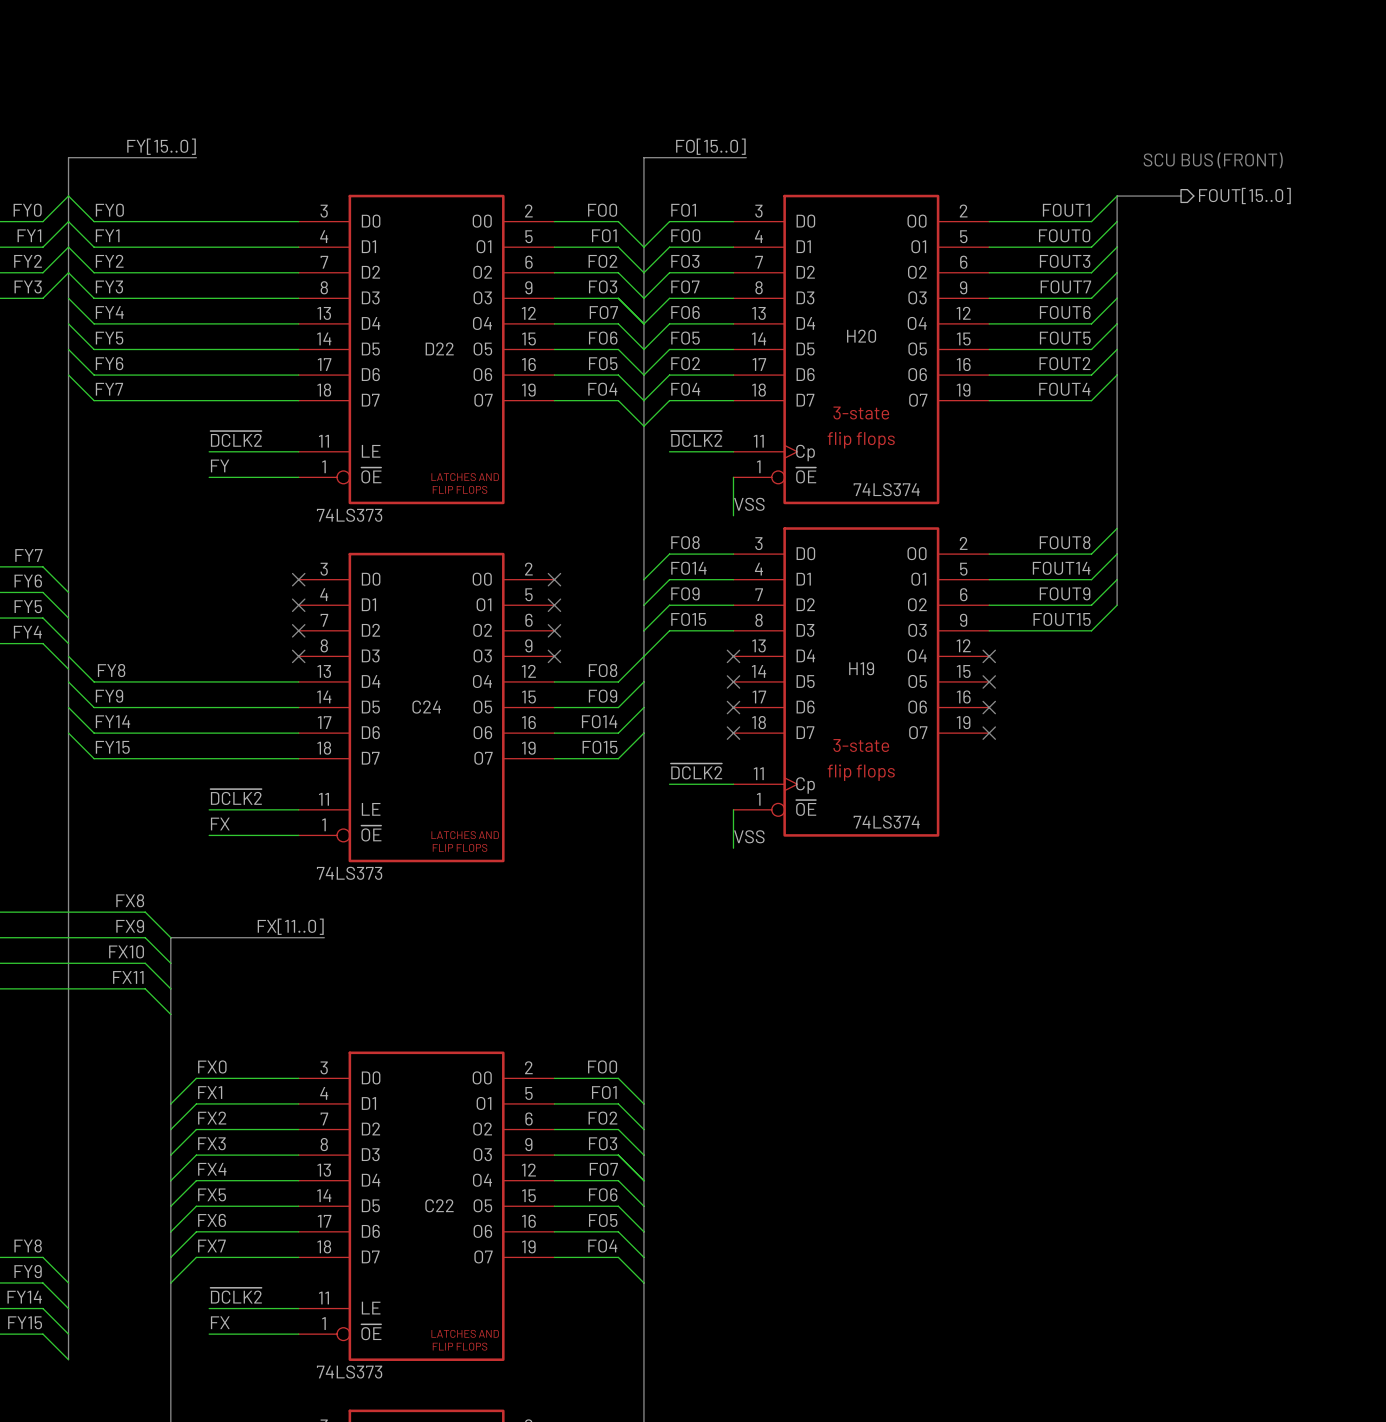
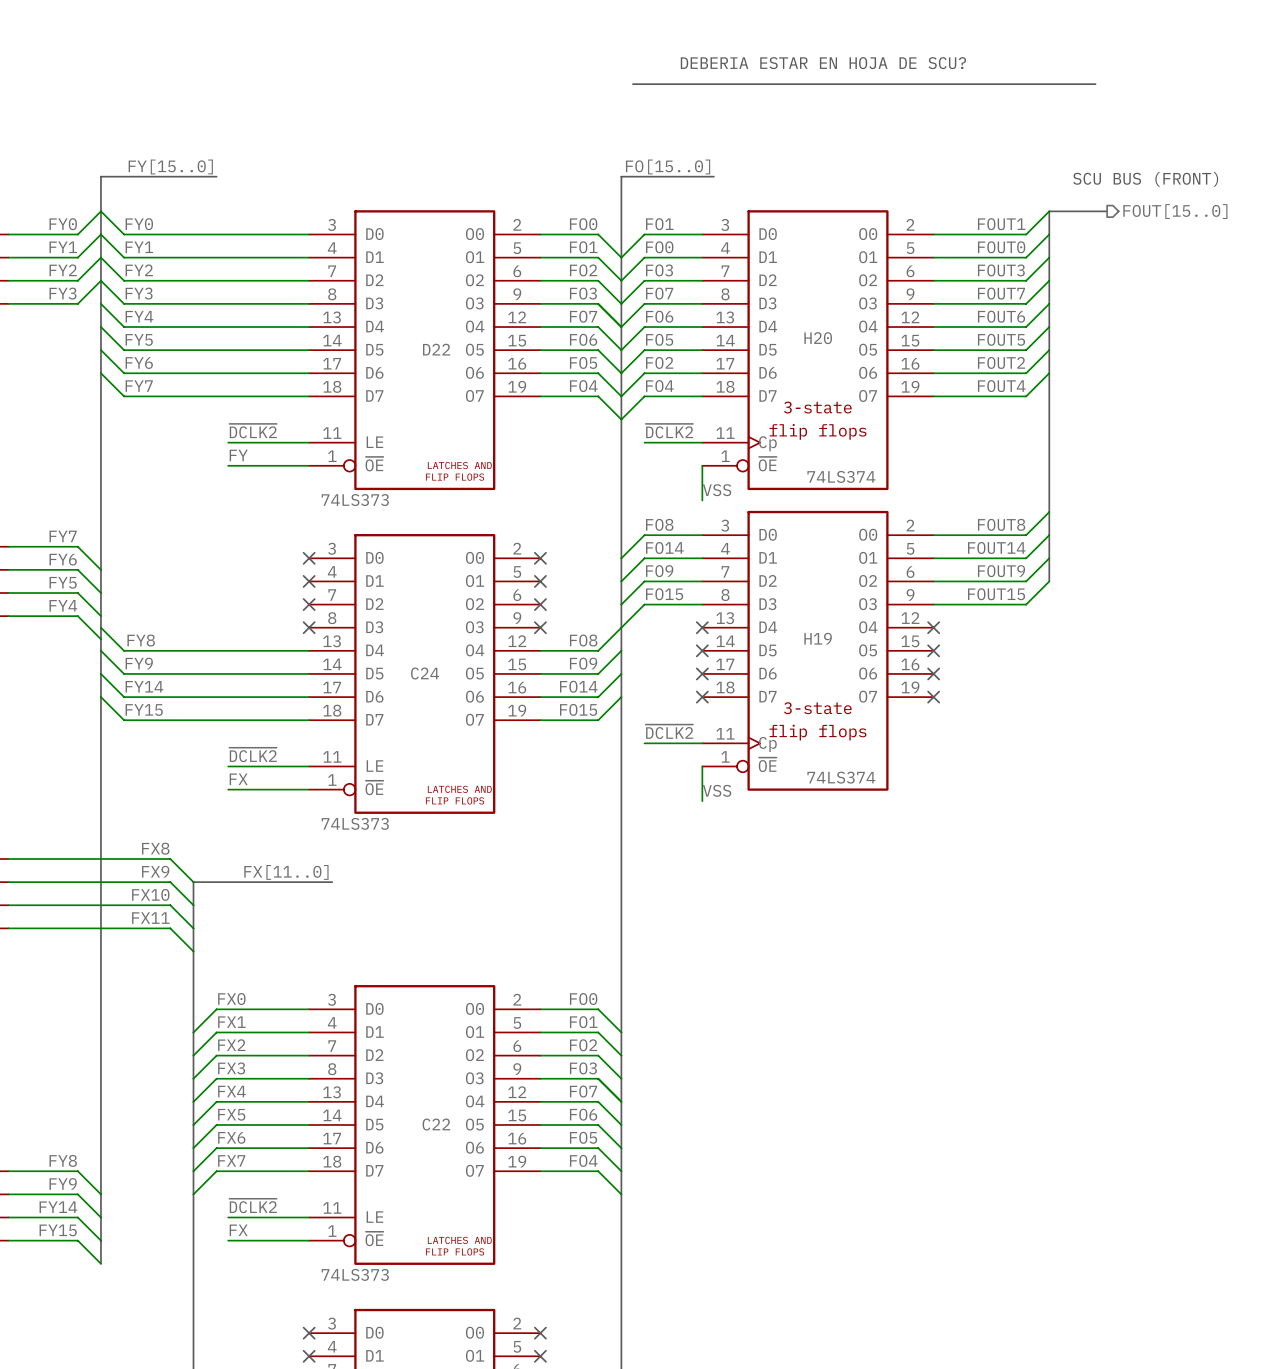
text: none -> DEBERIA ESTAR EN HOJA DE SCU? (823, 63)
line: none -> (632, 84) (1095, 84)

